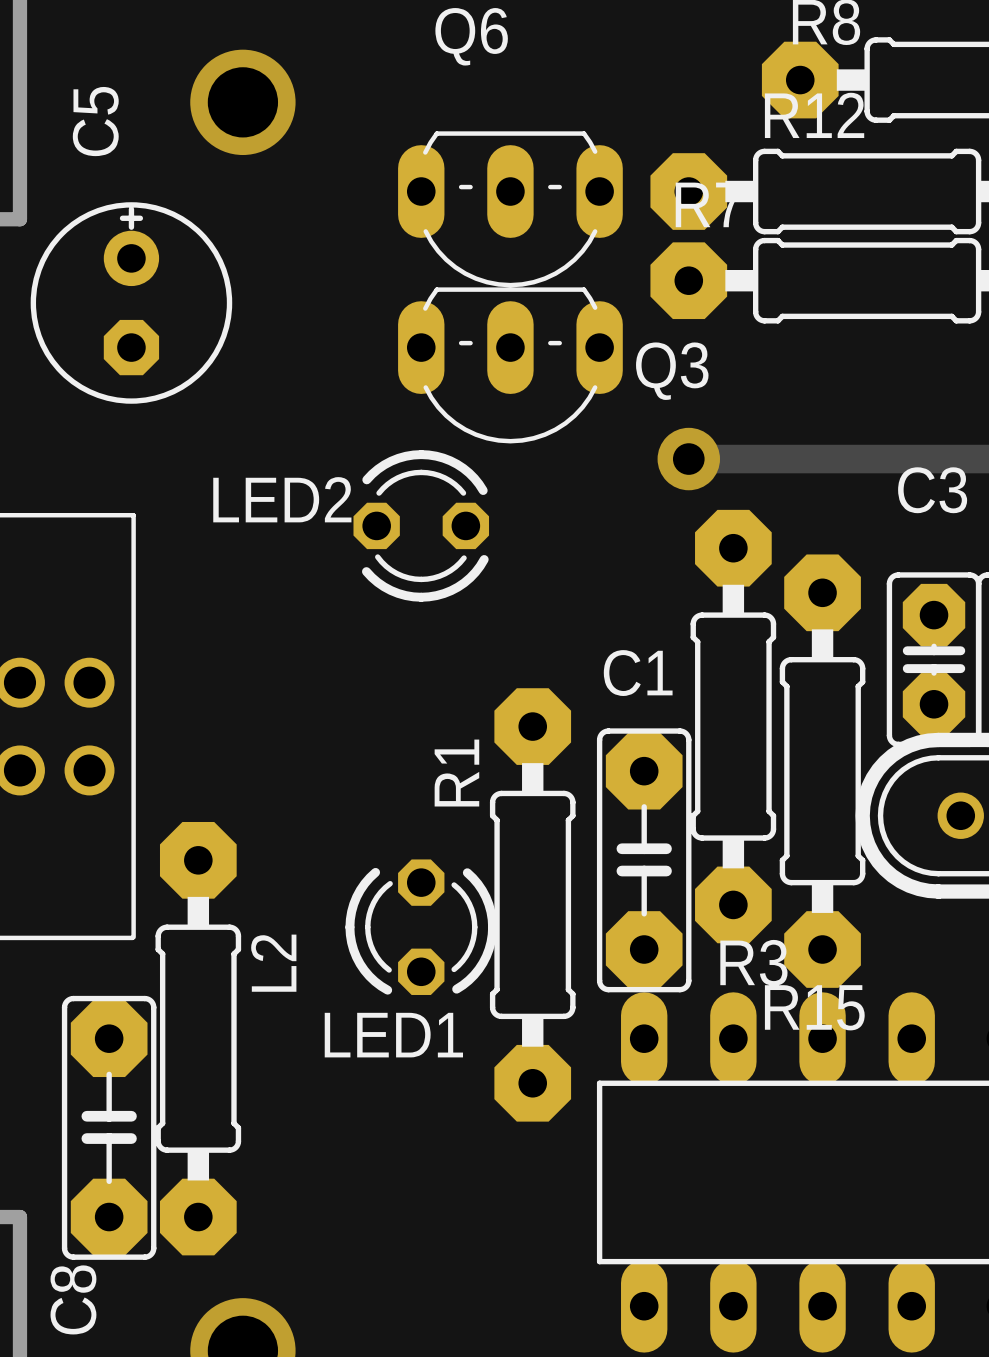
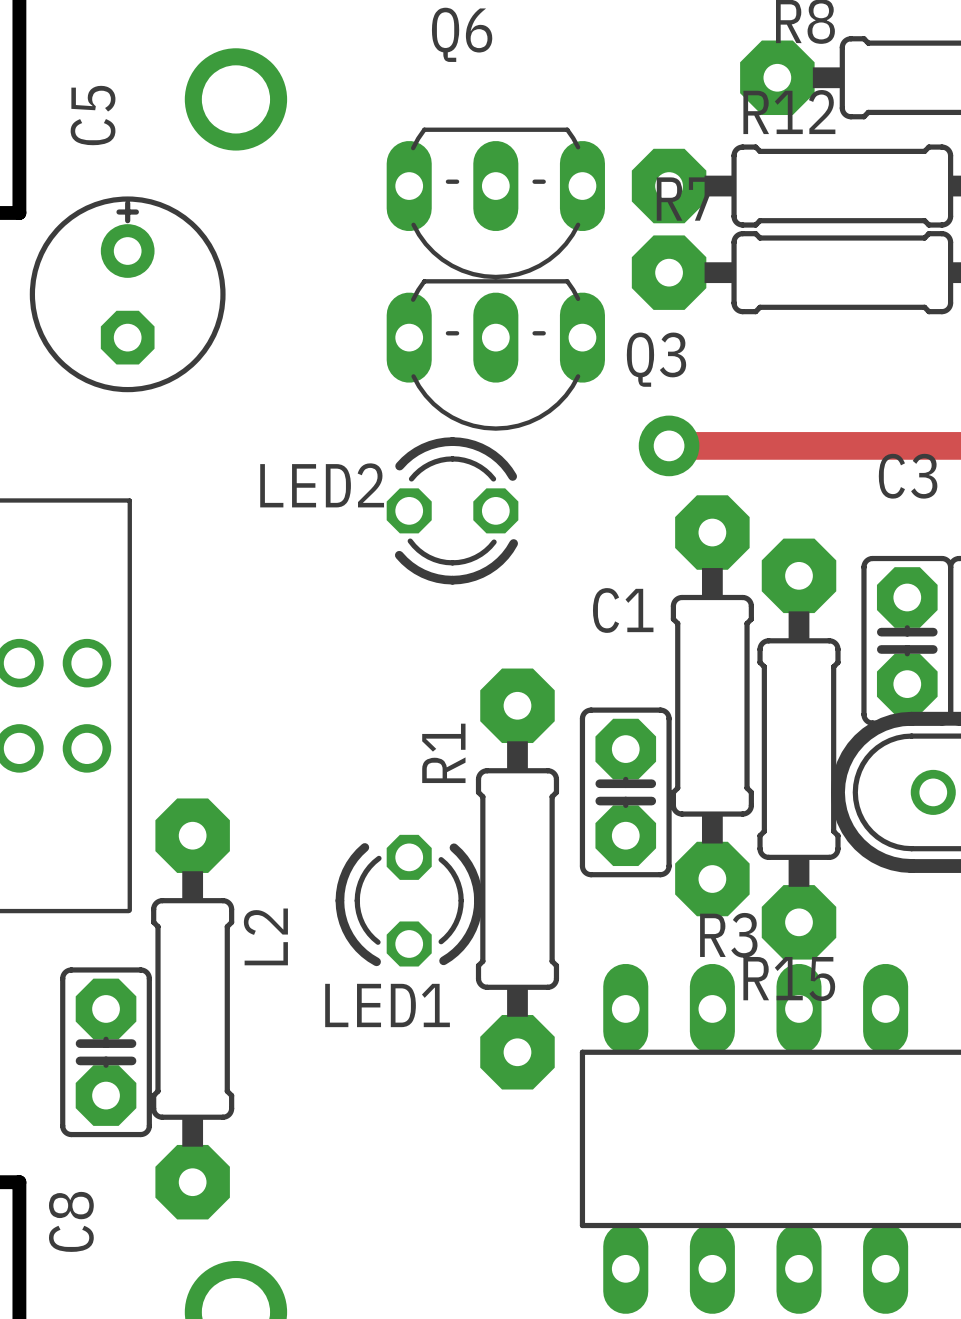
LED2 position: (421, 525) -> (452, 510)
C1 footprint: [596, 728, 692, 993] -> [579, 707, 672, 878]
C8 footprint: [61, 995, 157, 1260] -> [60, 967, 152, 1138]

